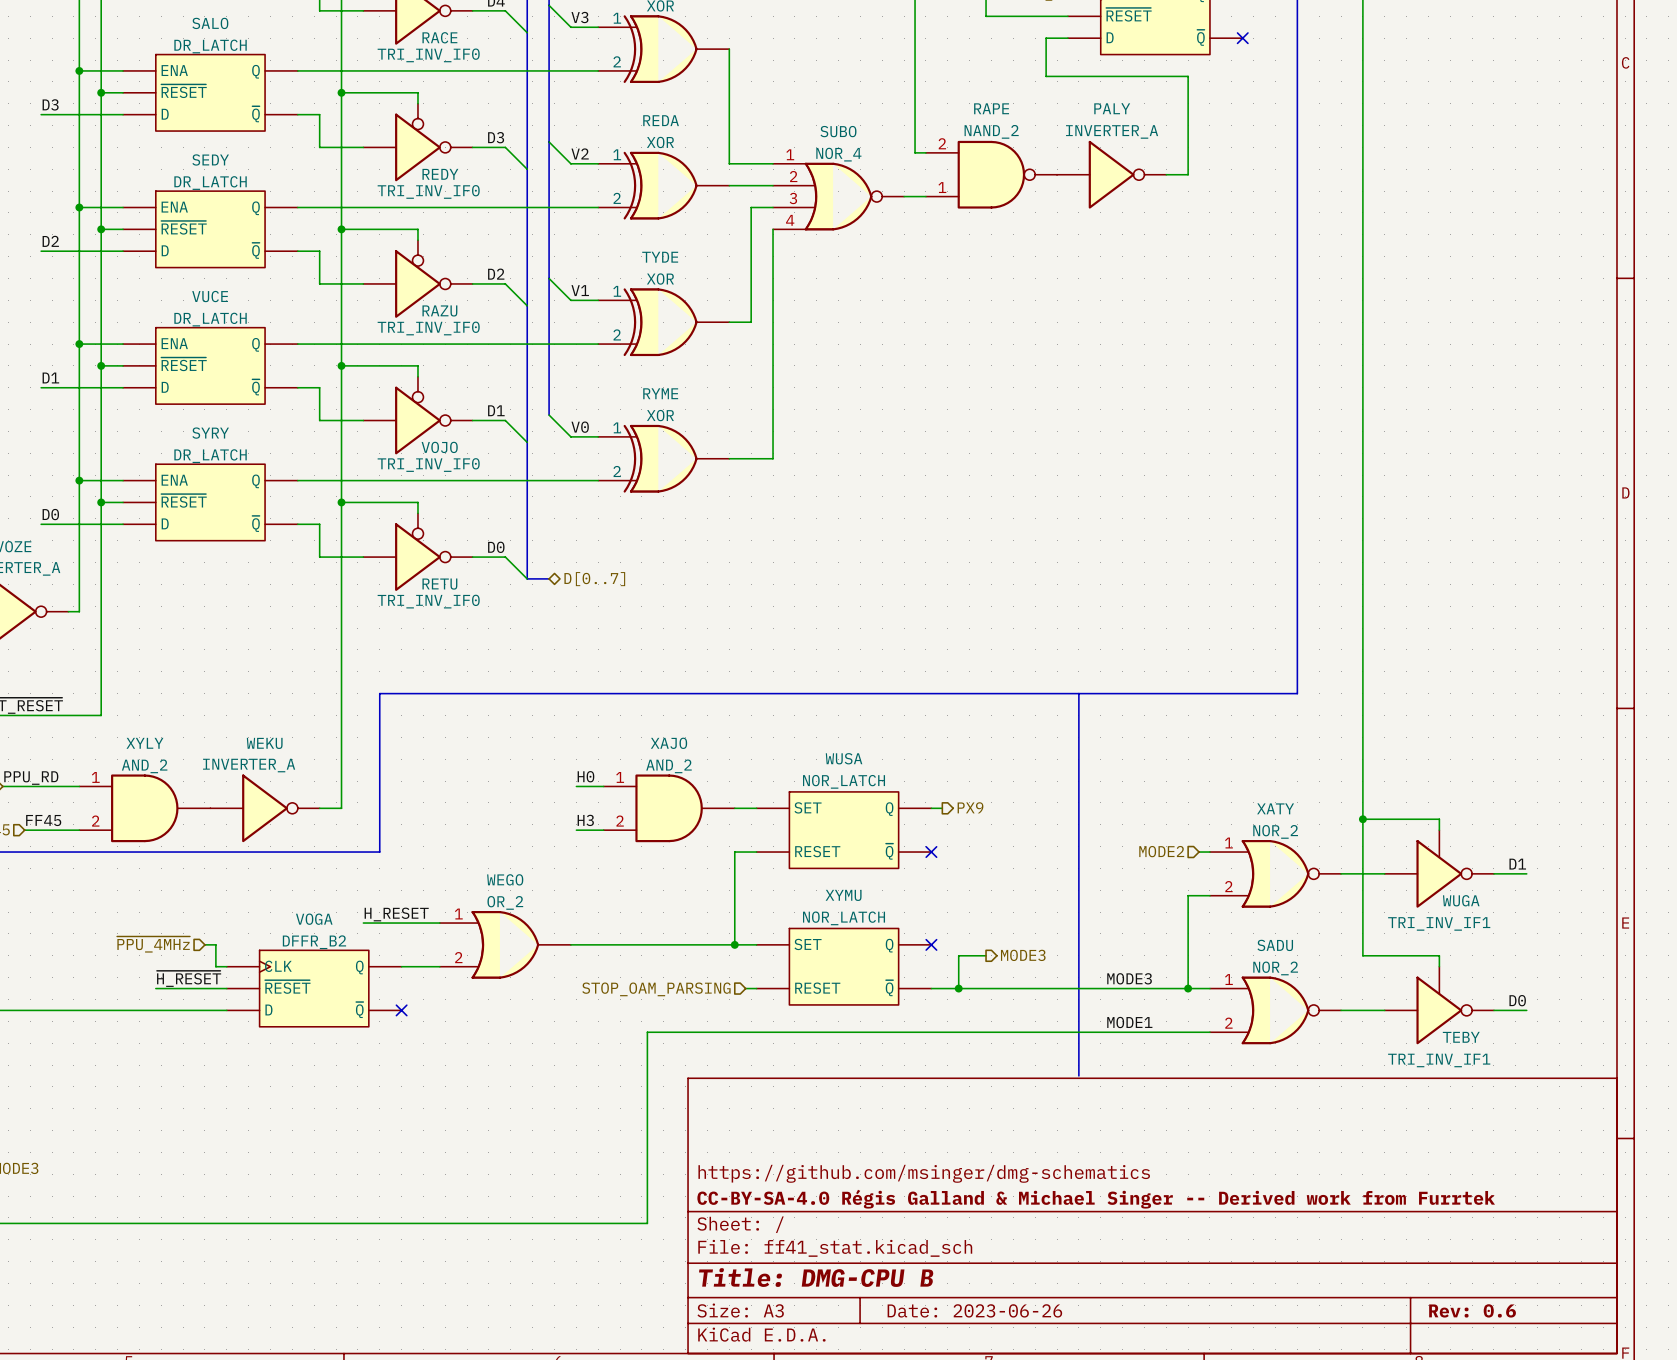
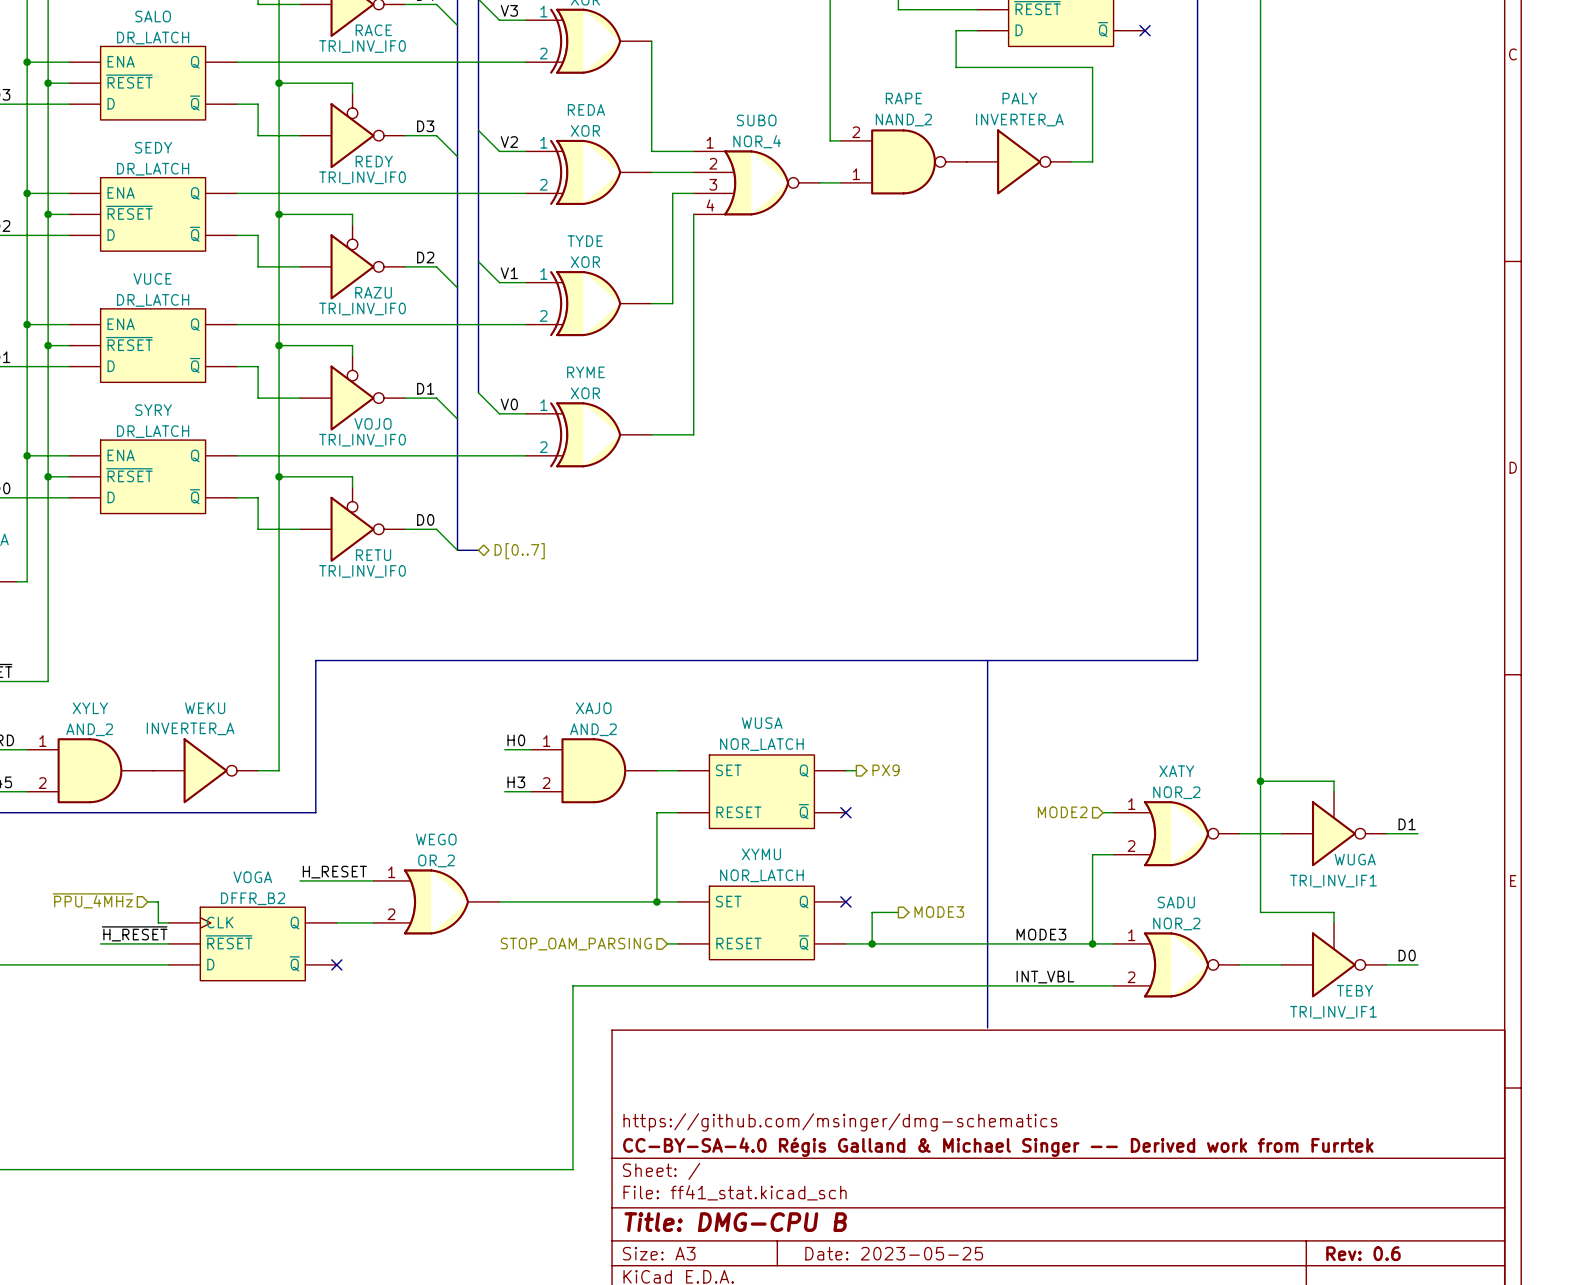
label: MODE1 (1129, 1022) -> INT_VBL (1045, 977)
title block: Date: 2023-06-26 (974, 1310) -> Date: 2023-05-25 (894, 1253)

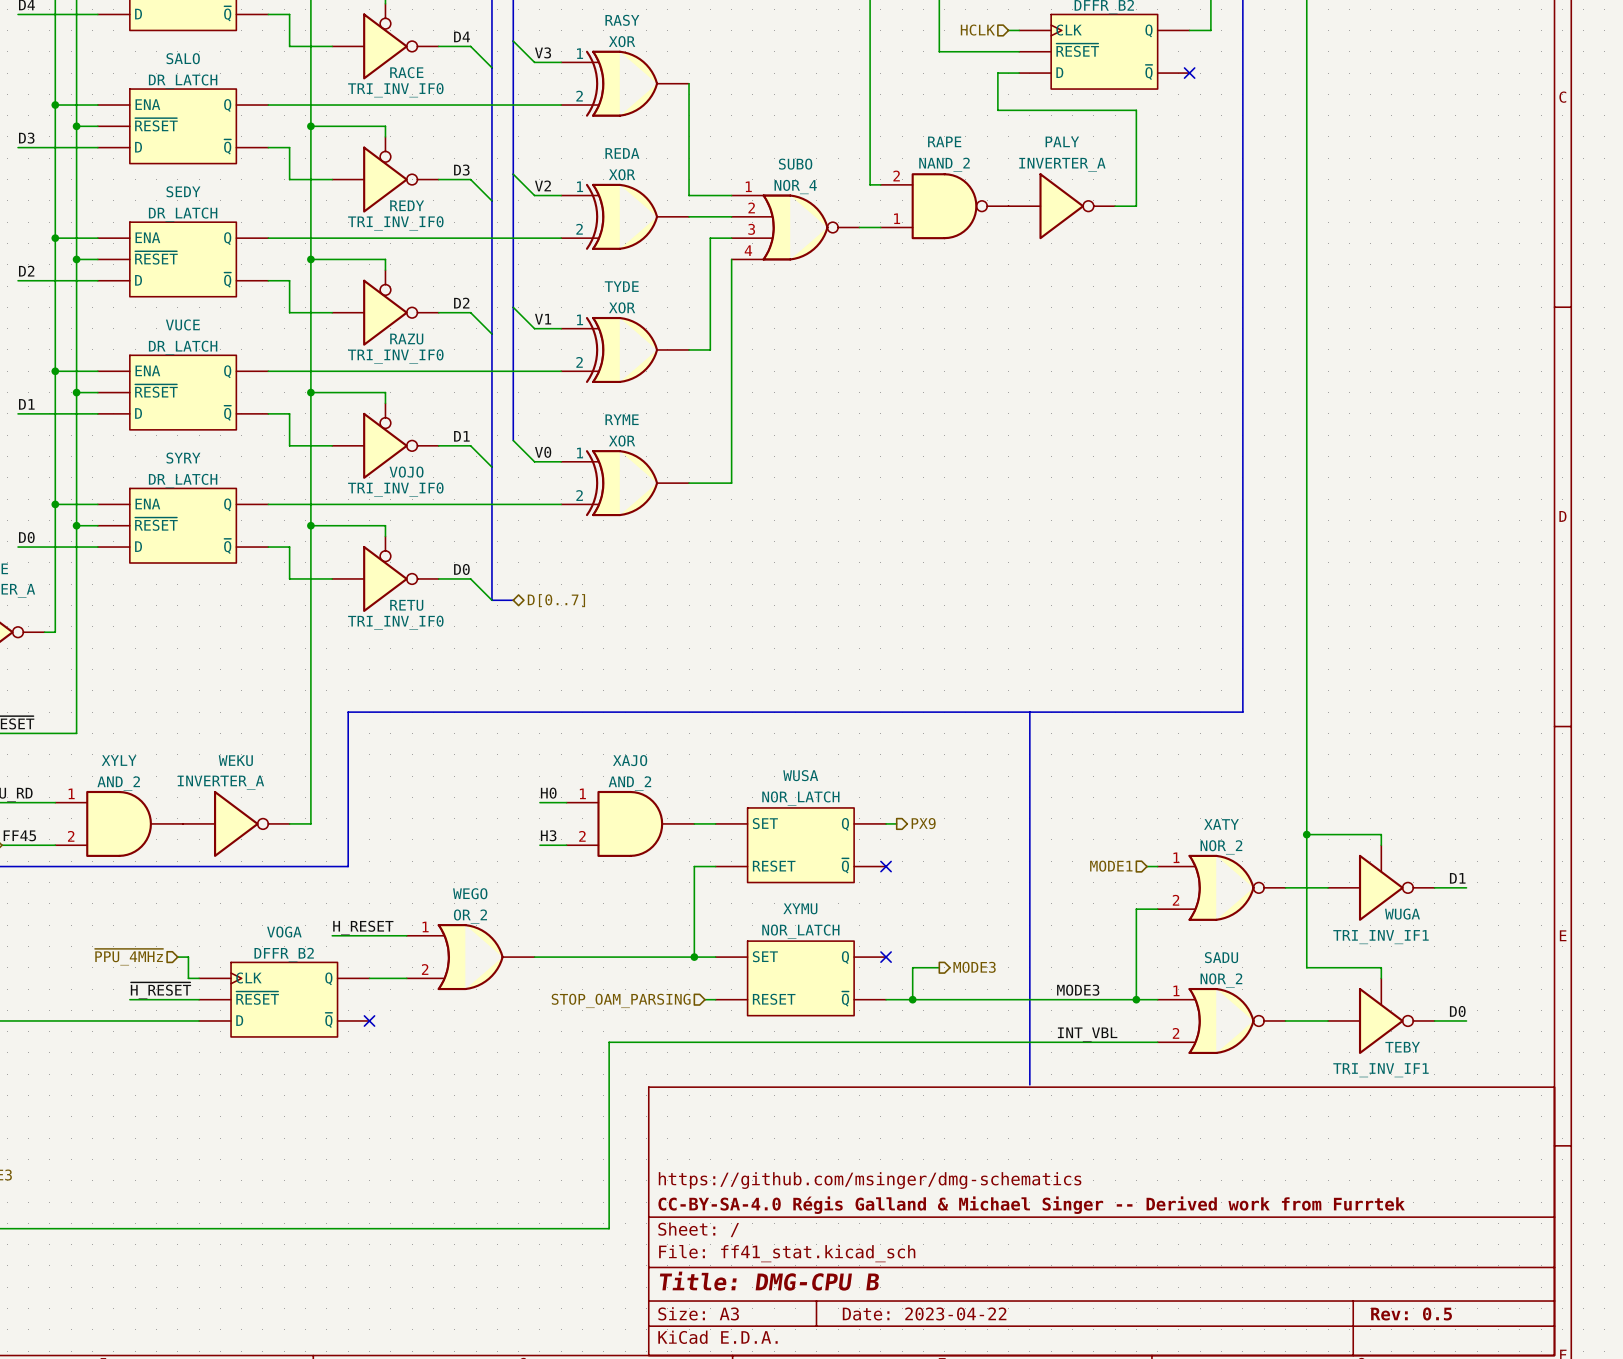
hierarchical label: MODE2 (1062, 812) -> MODE1 (1111, 866)
title block: Date: 2023-05-25 (894, 1253) -> Date: 2023-04-22 (924, 1313)
title block: Rev: 0.6 (1363, 1253) -> Rev: 0.5 (1411, 1313)

